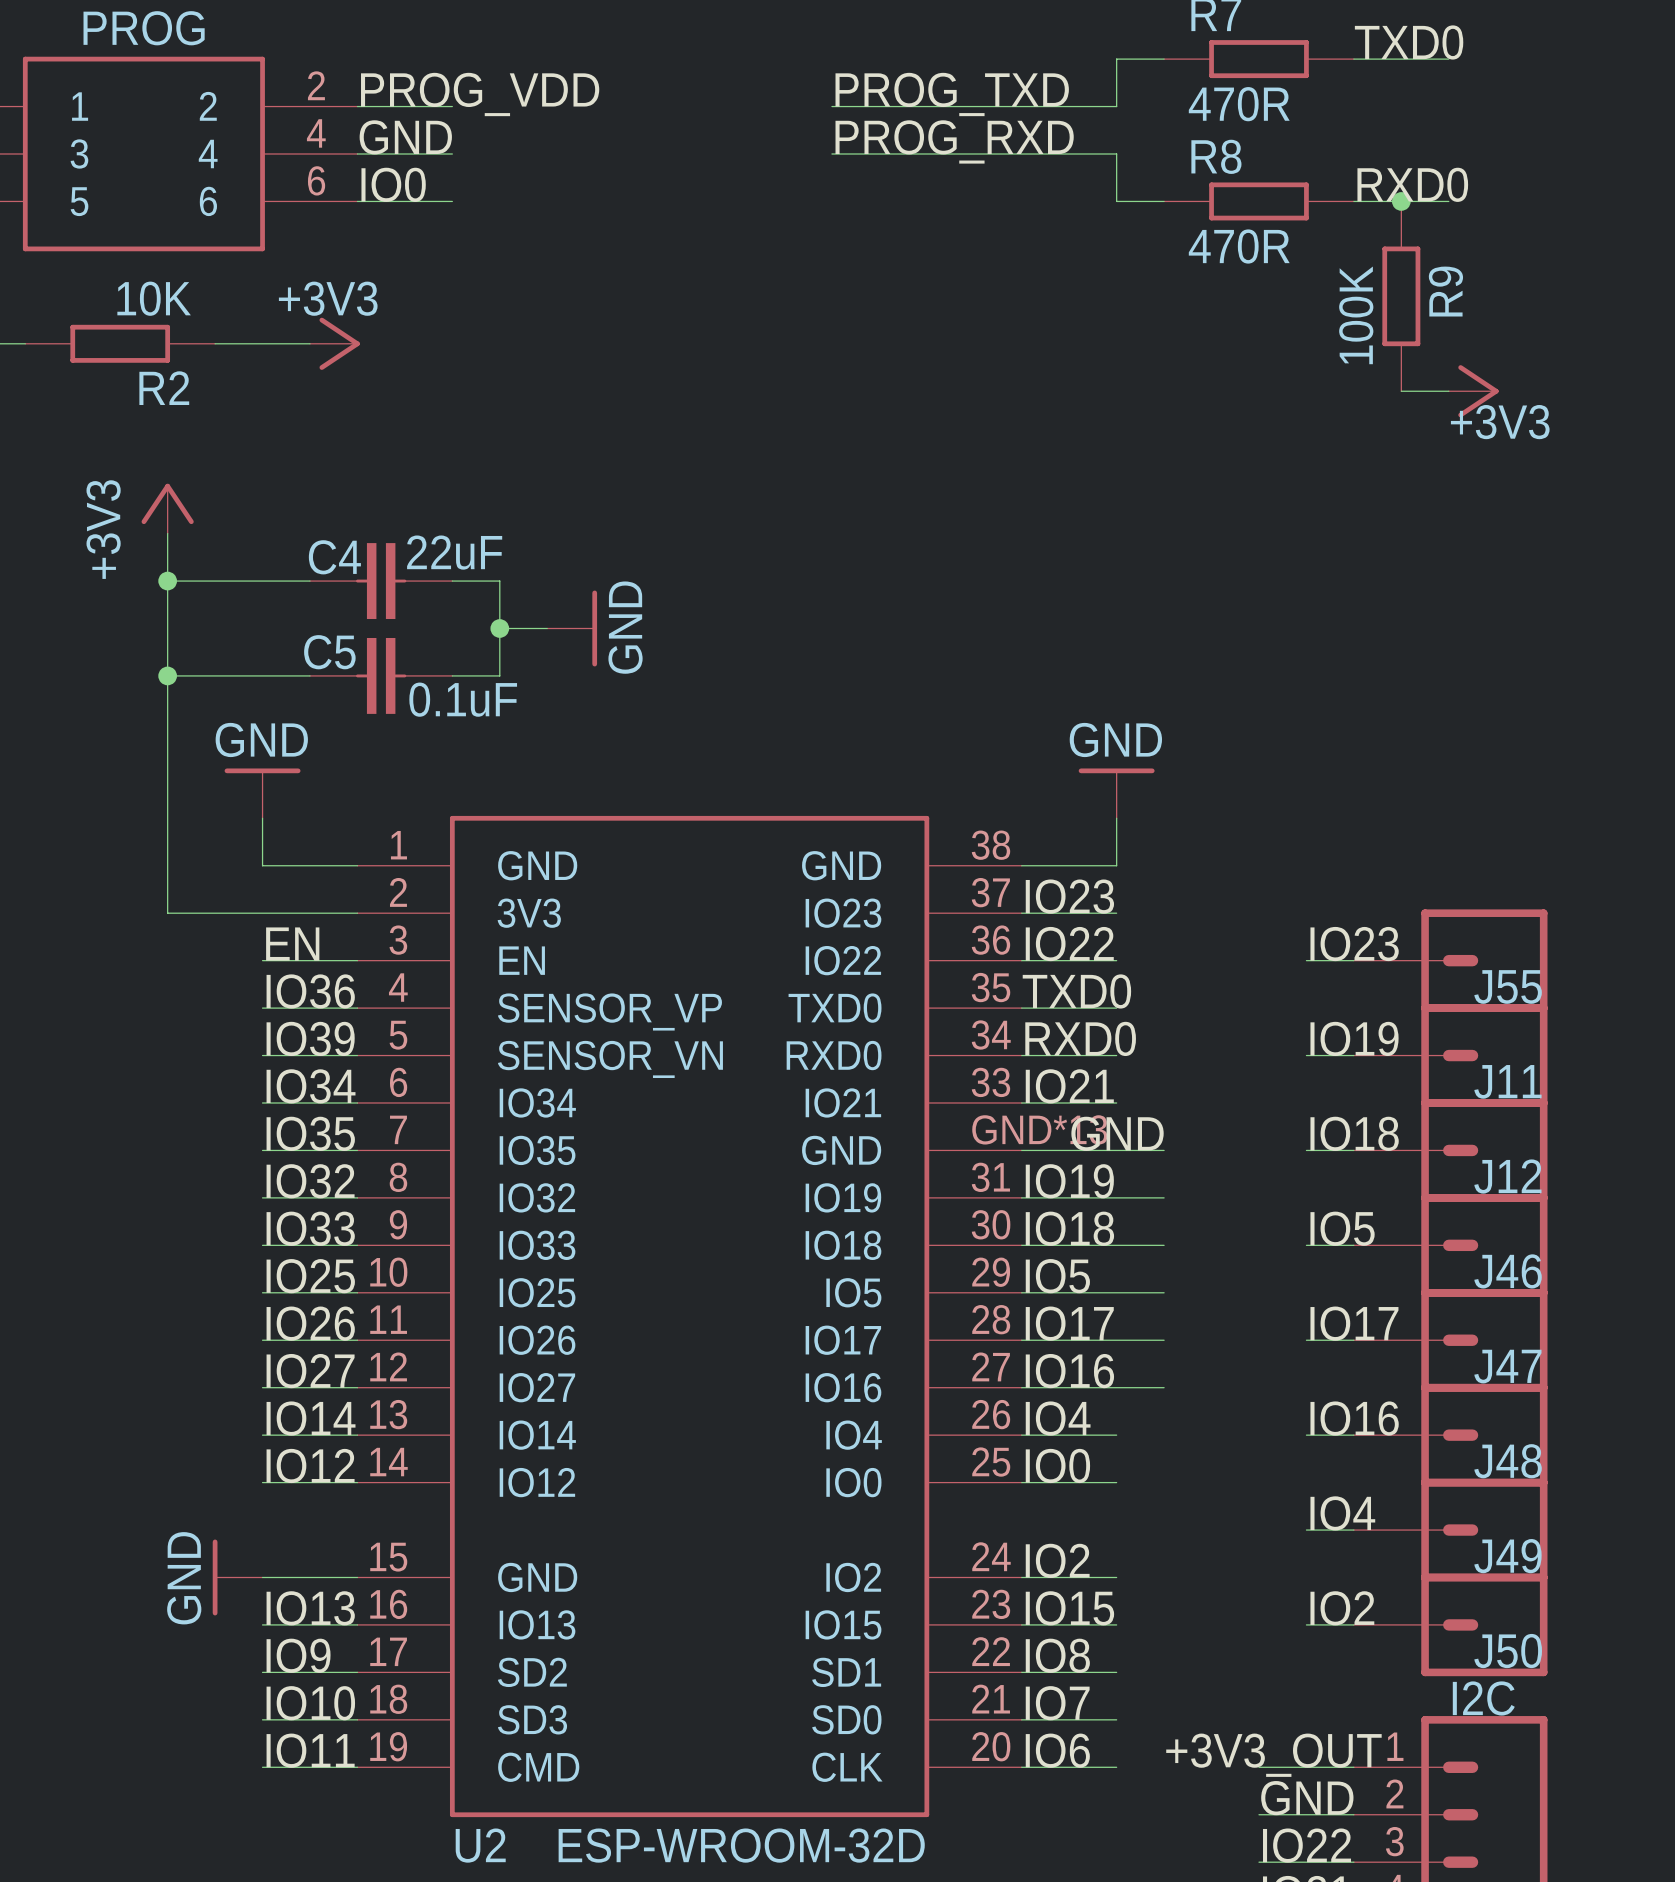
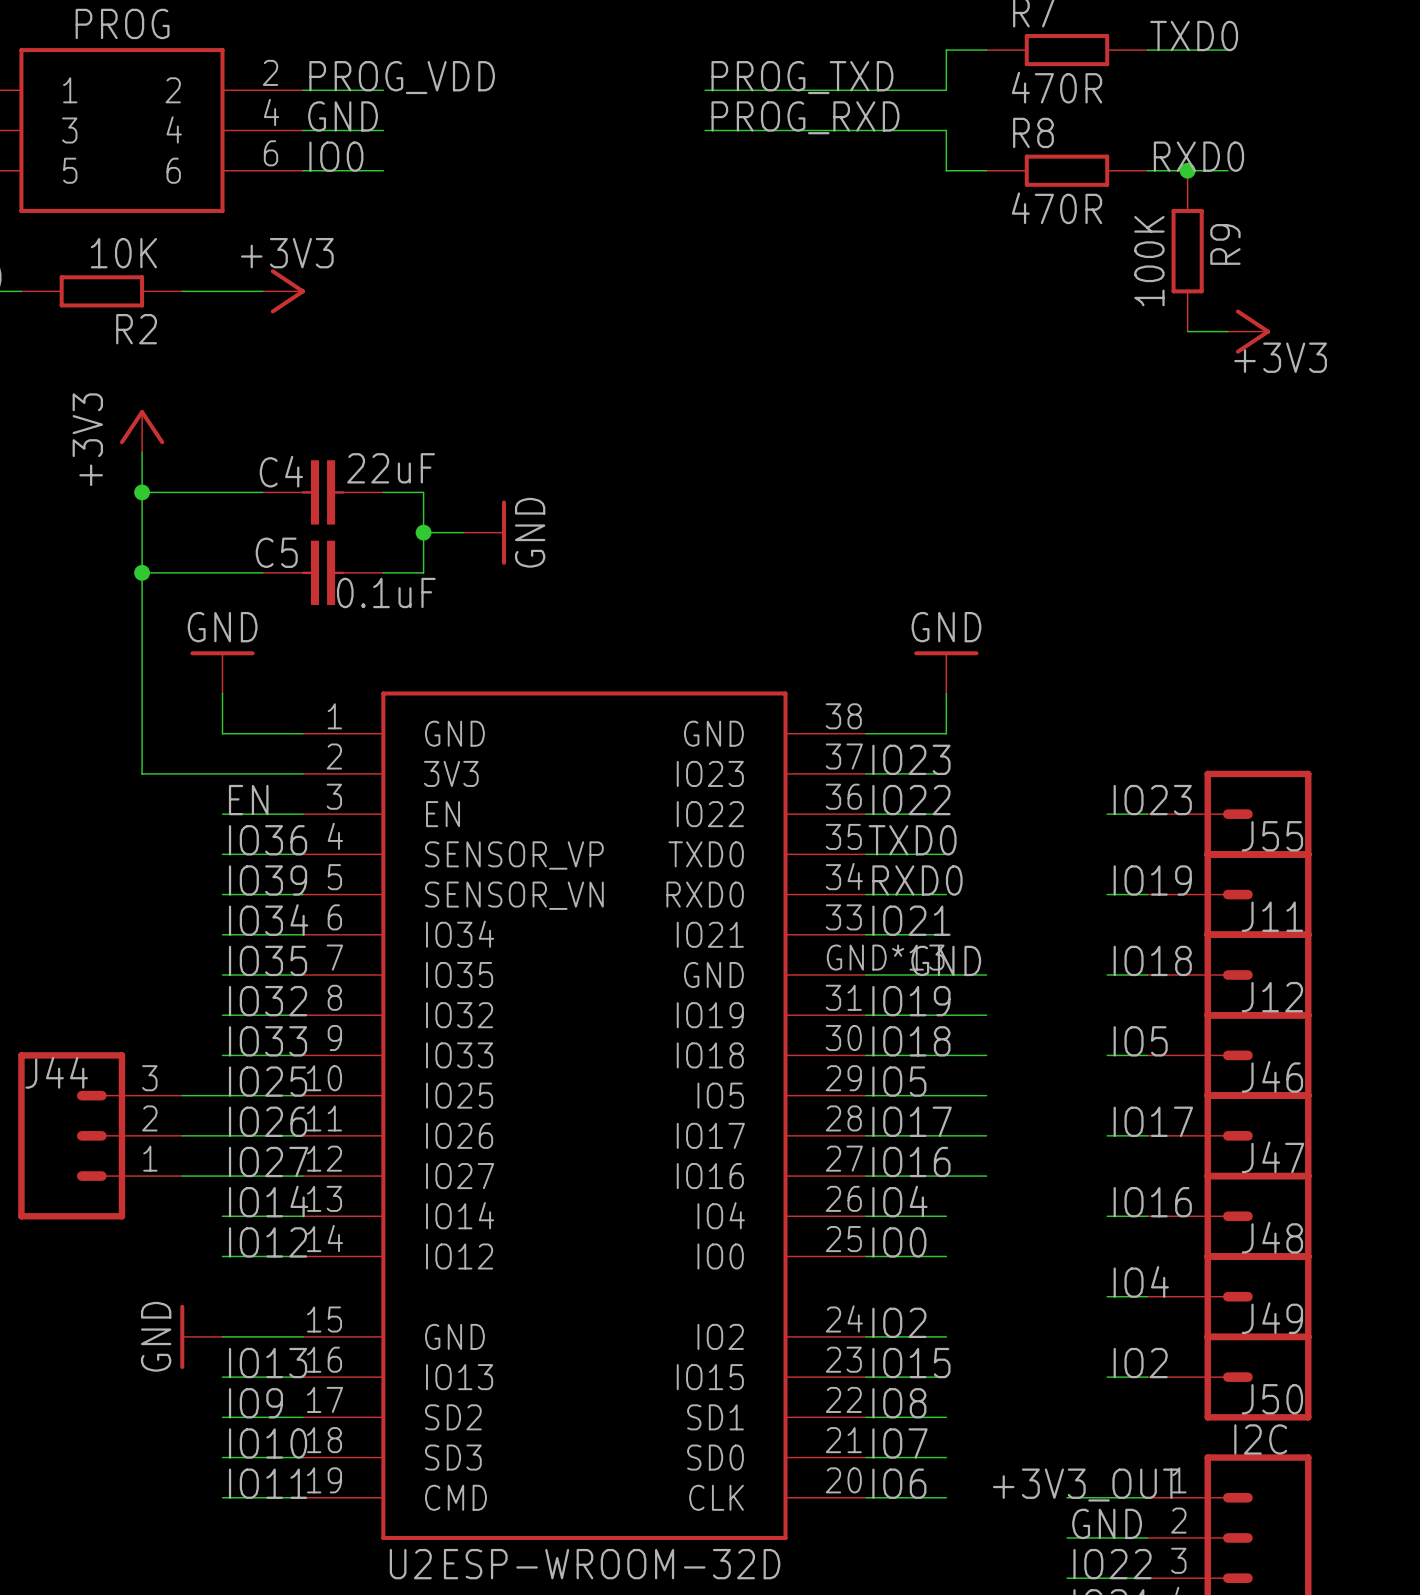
wire: none -> (182, 1095) (222, 1095)
J44: none -> (100, 1135)
wire: none -> (182, 1135) (222, 1135)
wire: none -> (182, 1176) (222, 1176)

